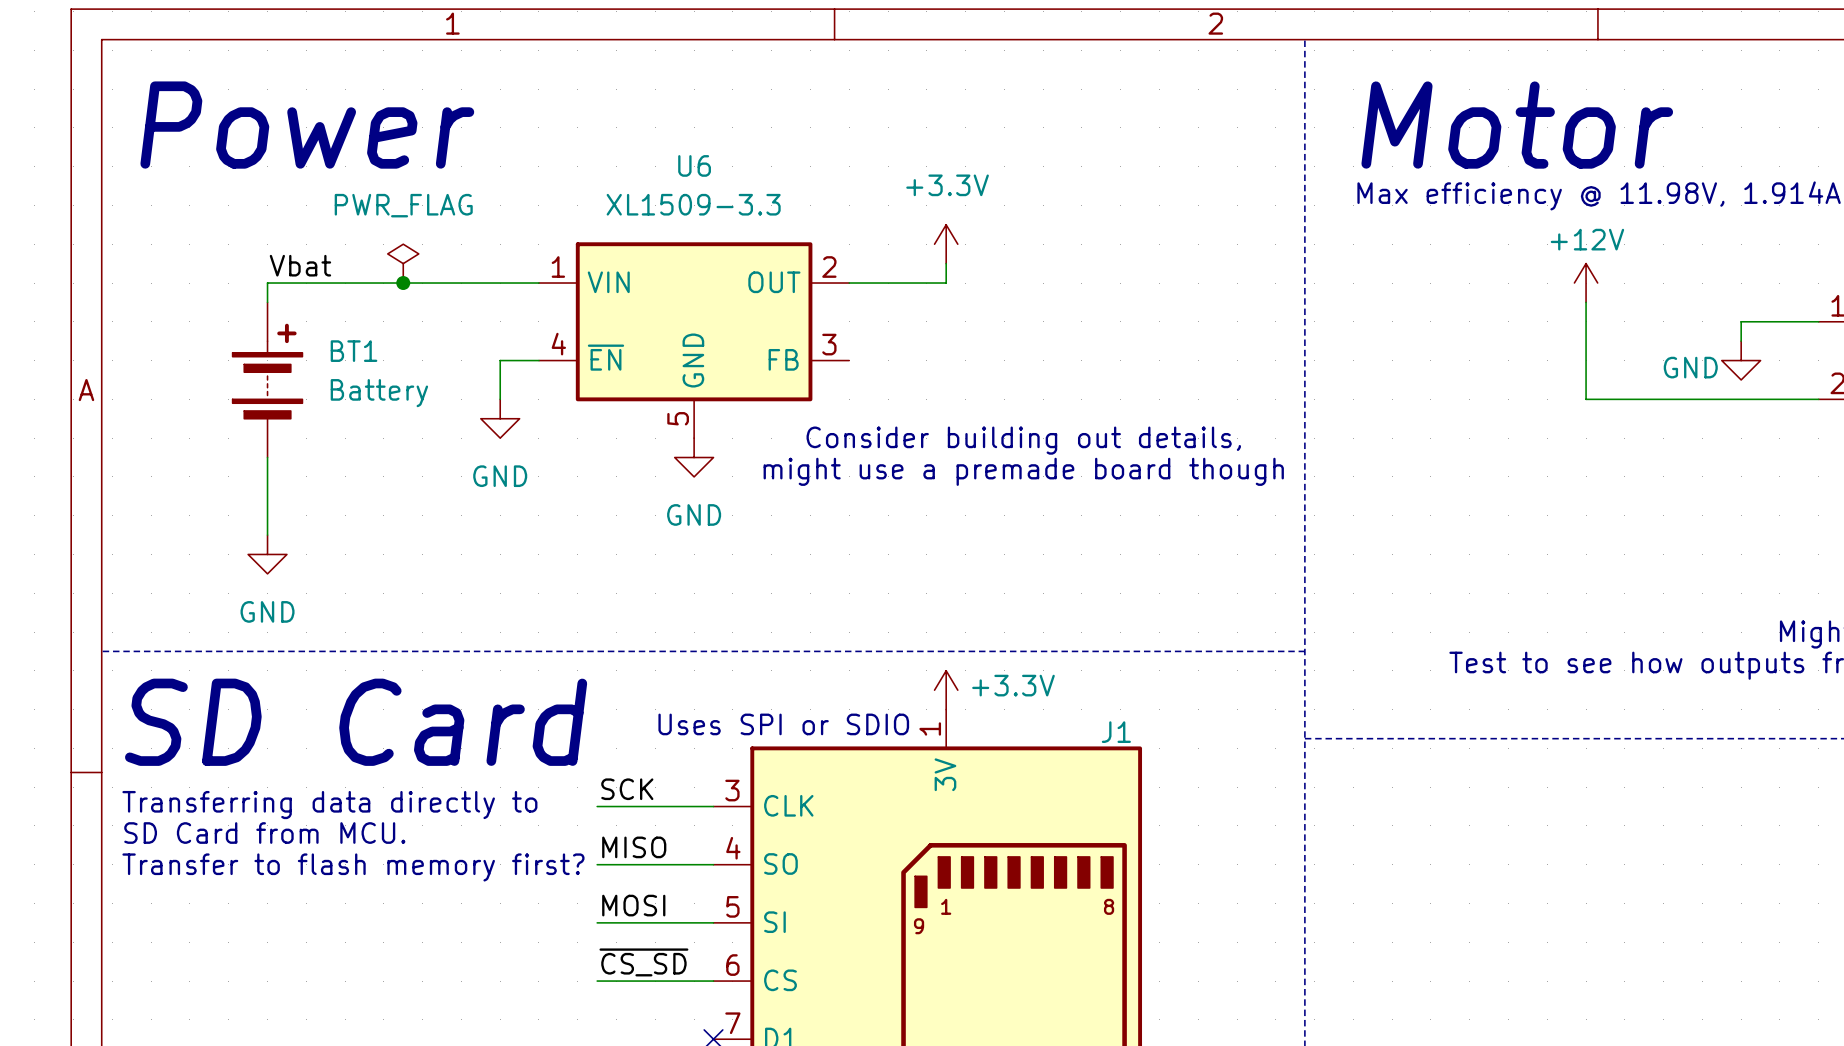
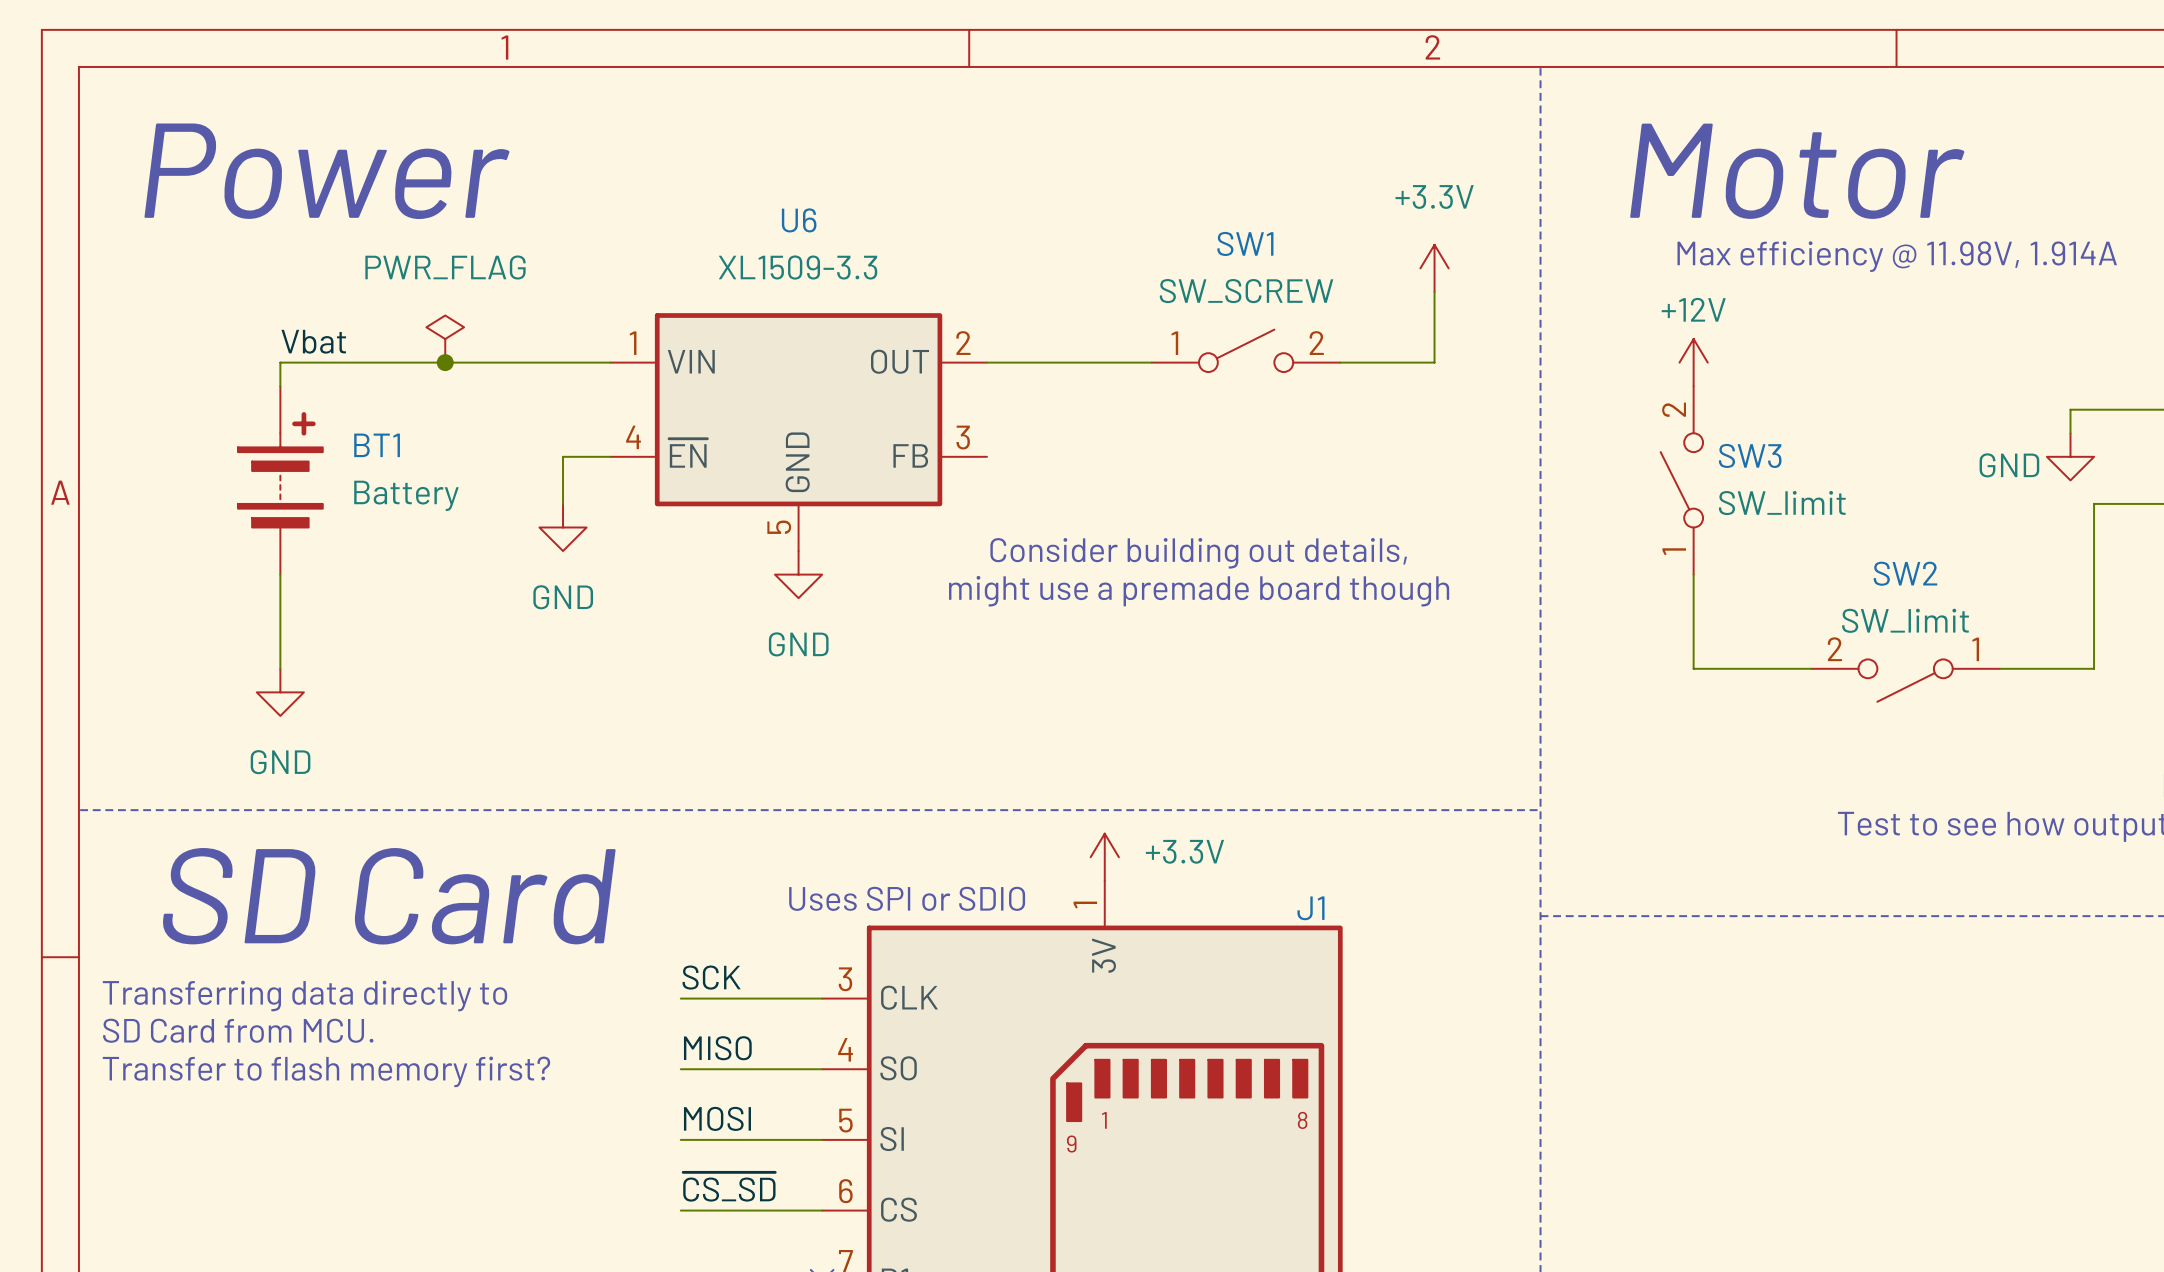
wire: none -> (1434, 291) (1434, 362) (1340, 362)
power symbol position: +3.3V (946, 244) -> +3.3V (1434, 268)
wire: (946, 263) (946, 283) -> (1151, 362) (1104, 362)
SW1: none -> SW_SCREW (1246, 350)
power symbol position: +12V (1586, 283) -> +12V (1693, 362)
wire: (1586, 302) (1586, 399) (1760, 399) -> (1999, 668) (2094, 668) (2094, 503)
SW3: none -> SW_limit (1681, 480)
wire: none -> (1693, 574) (1693, 668) (1811, 668)
SW2: none -> SW_limit (1905, 680)

